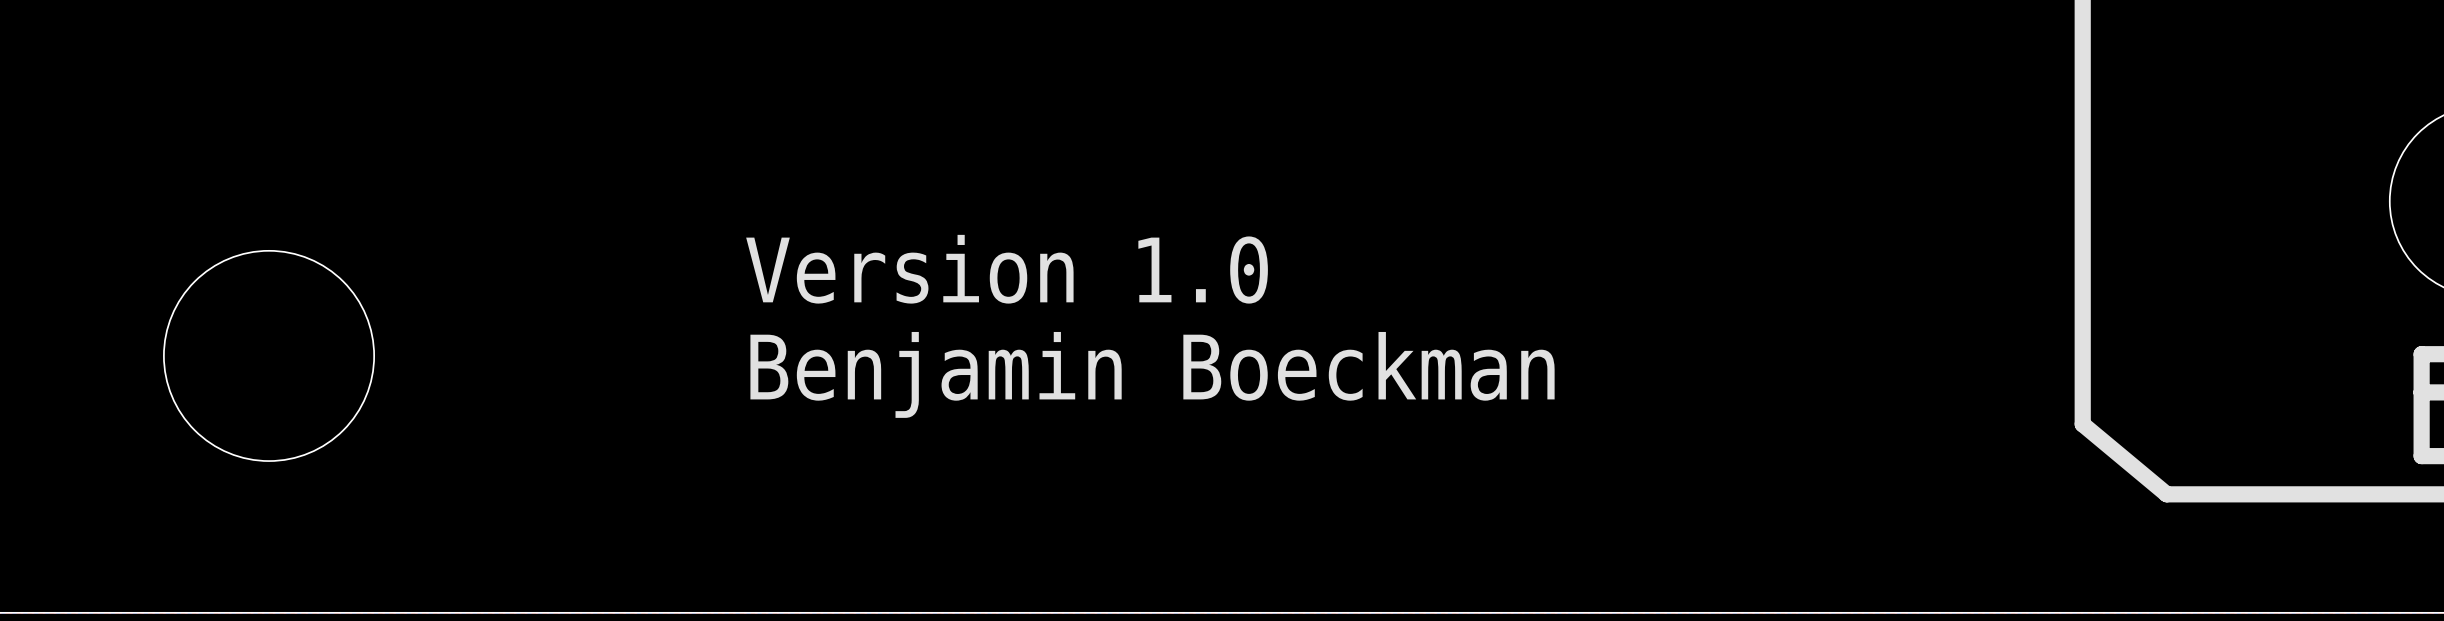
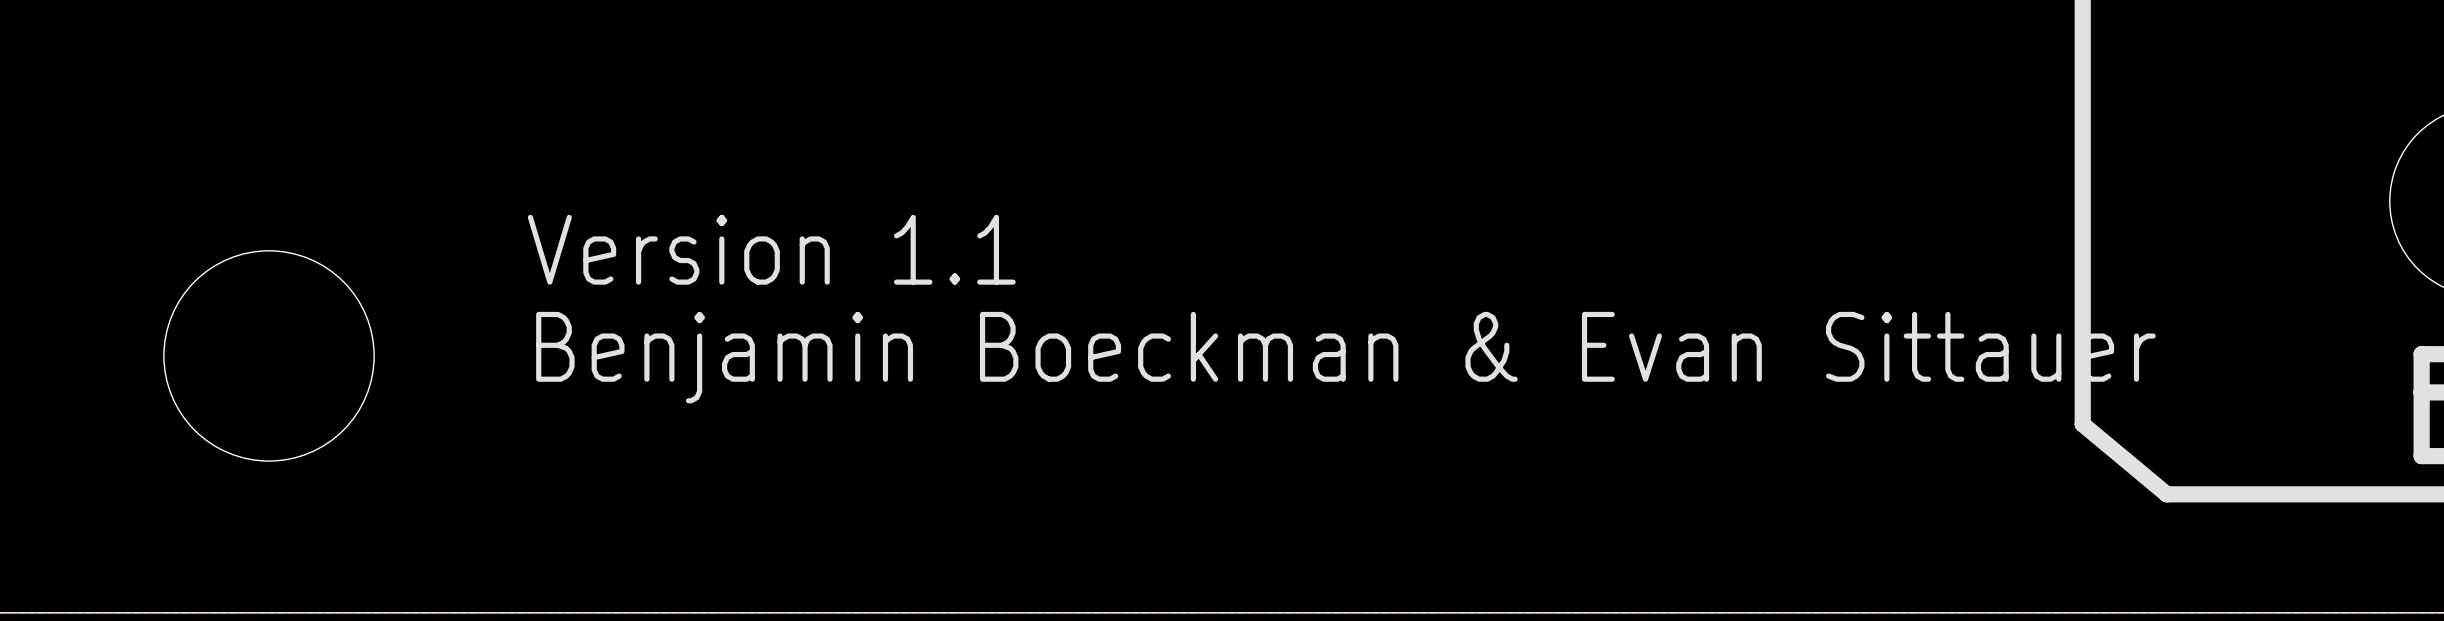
text: Version 1.0 (1007, 269) -> Version 1.1 (771, 249)
text: Benjamin Boeckman (1152, 374) -> Benjamin Boeckman & Evan Sittauer (1345, 357)

